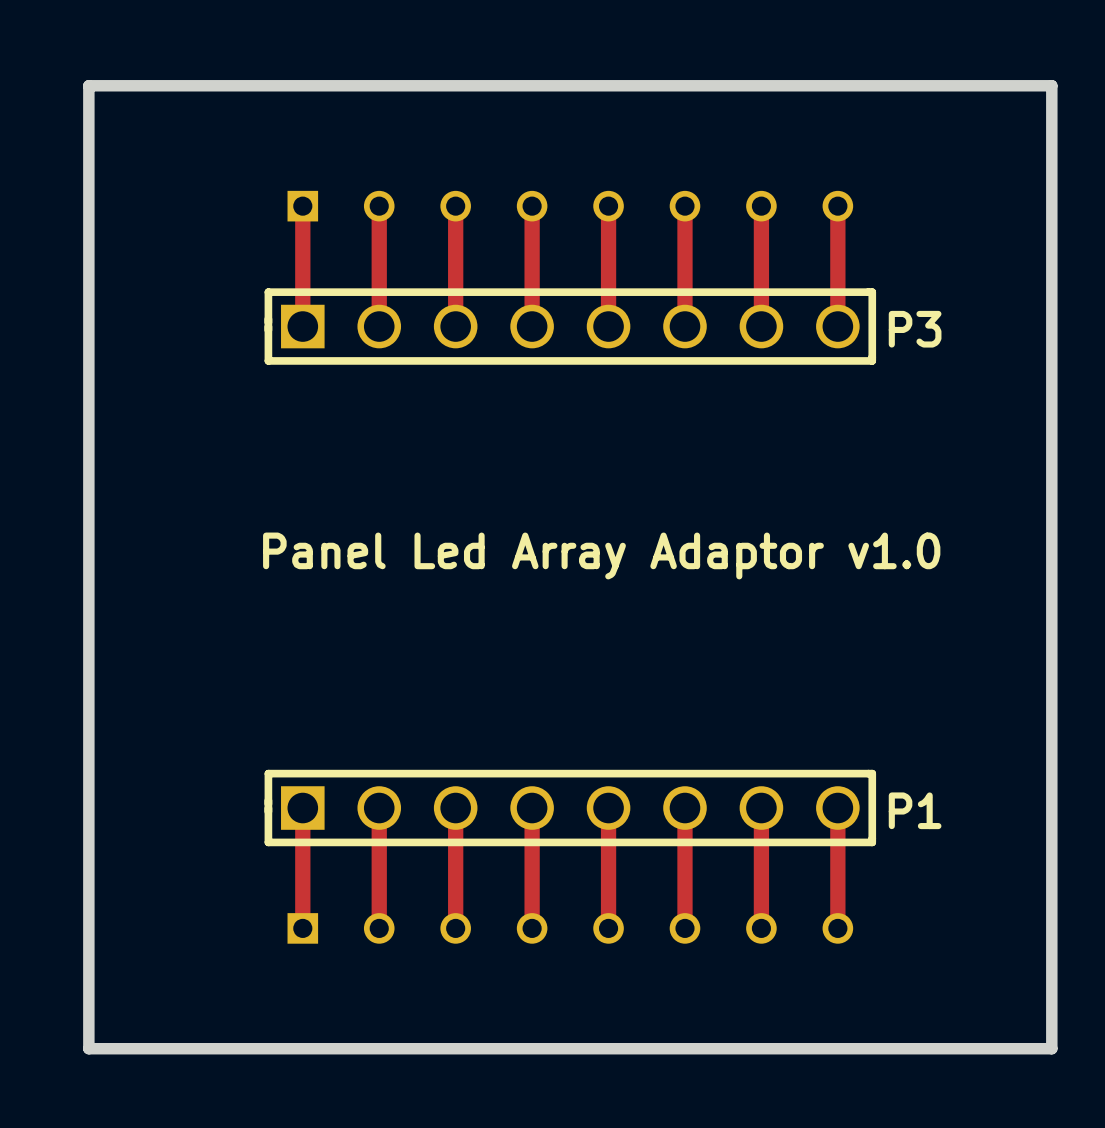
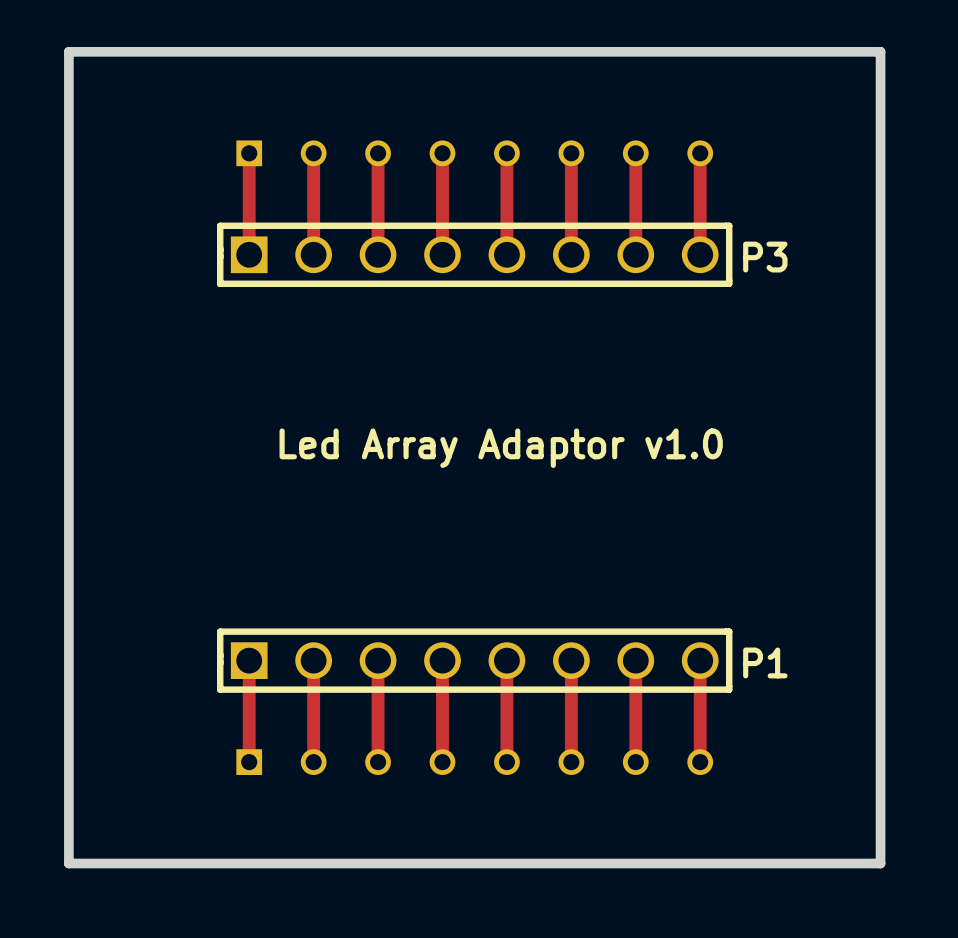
text: Panel Led Array Adaptor v1.0 (601, 555) -> Led Array Adaptor v1.0 (501, 448)

